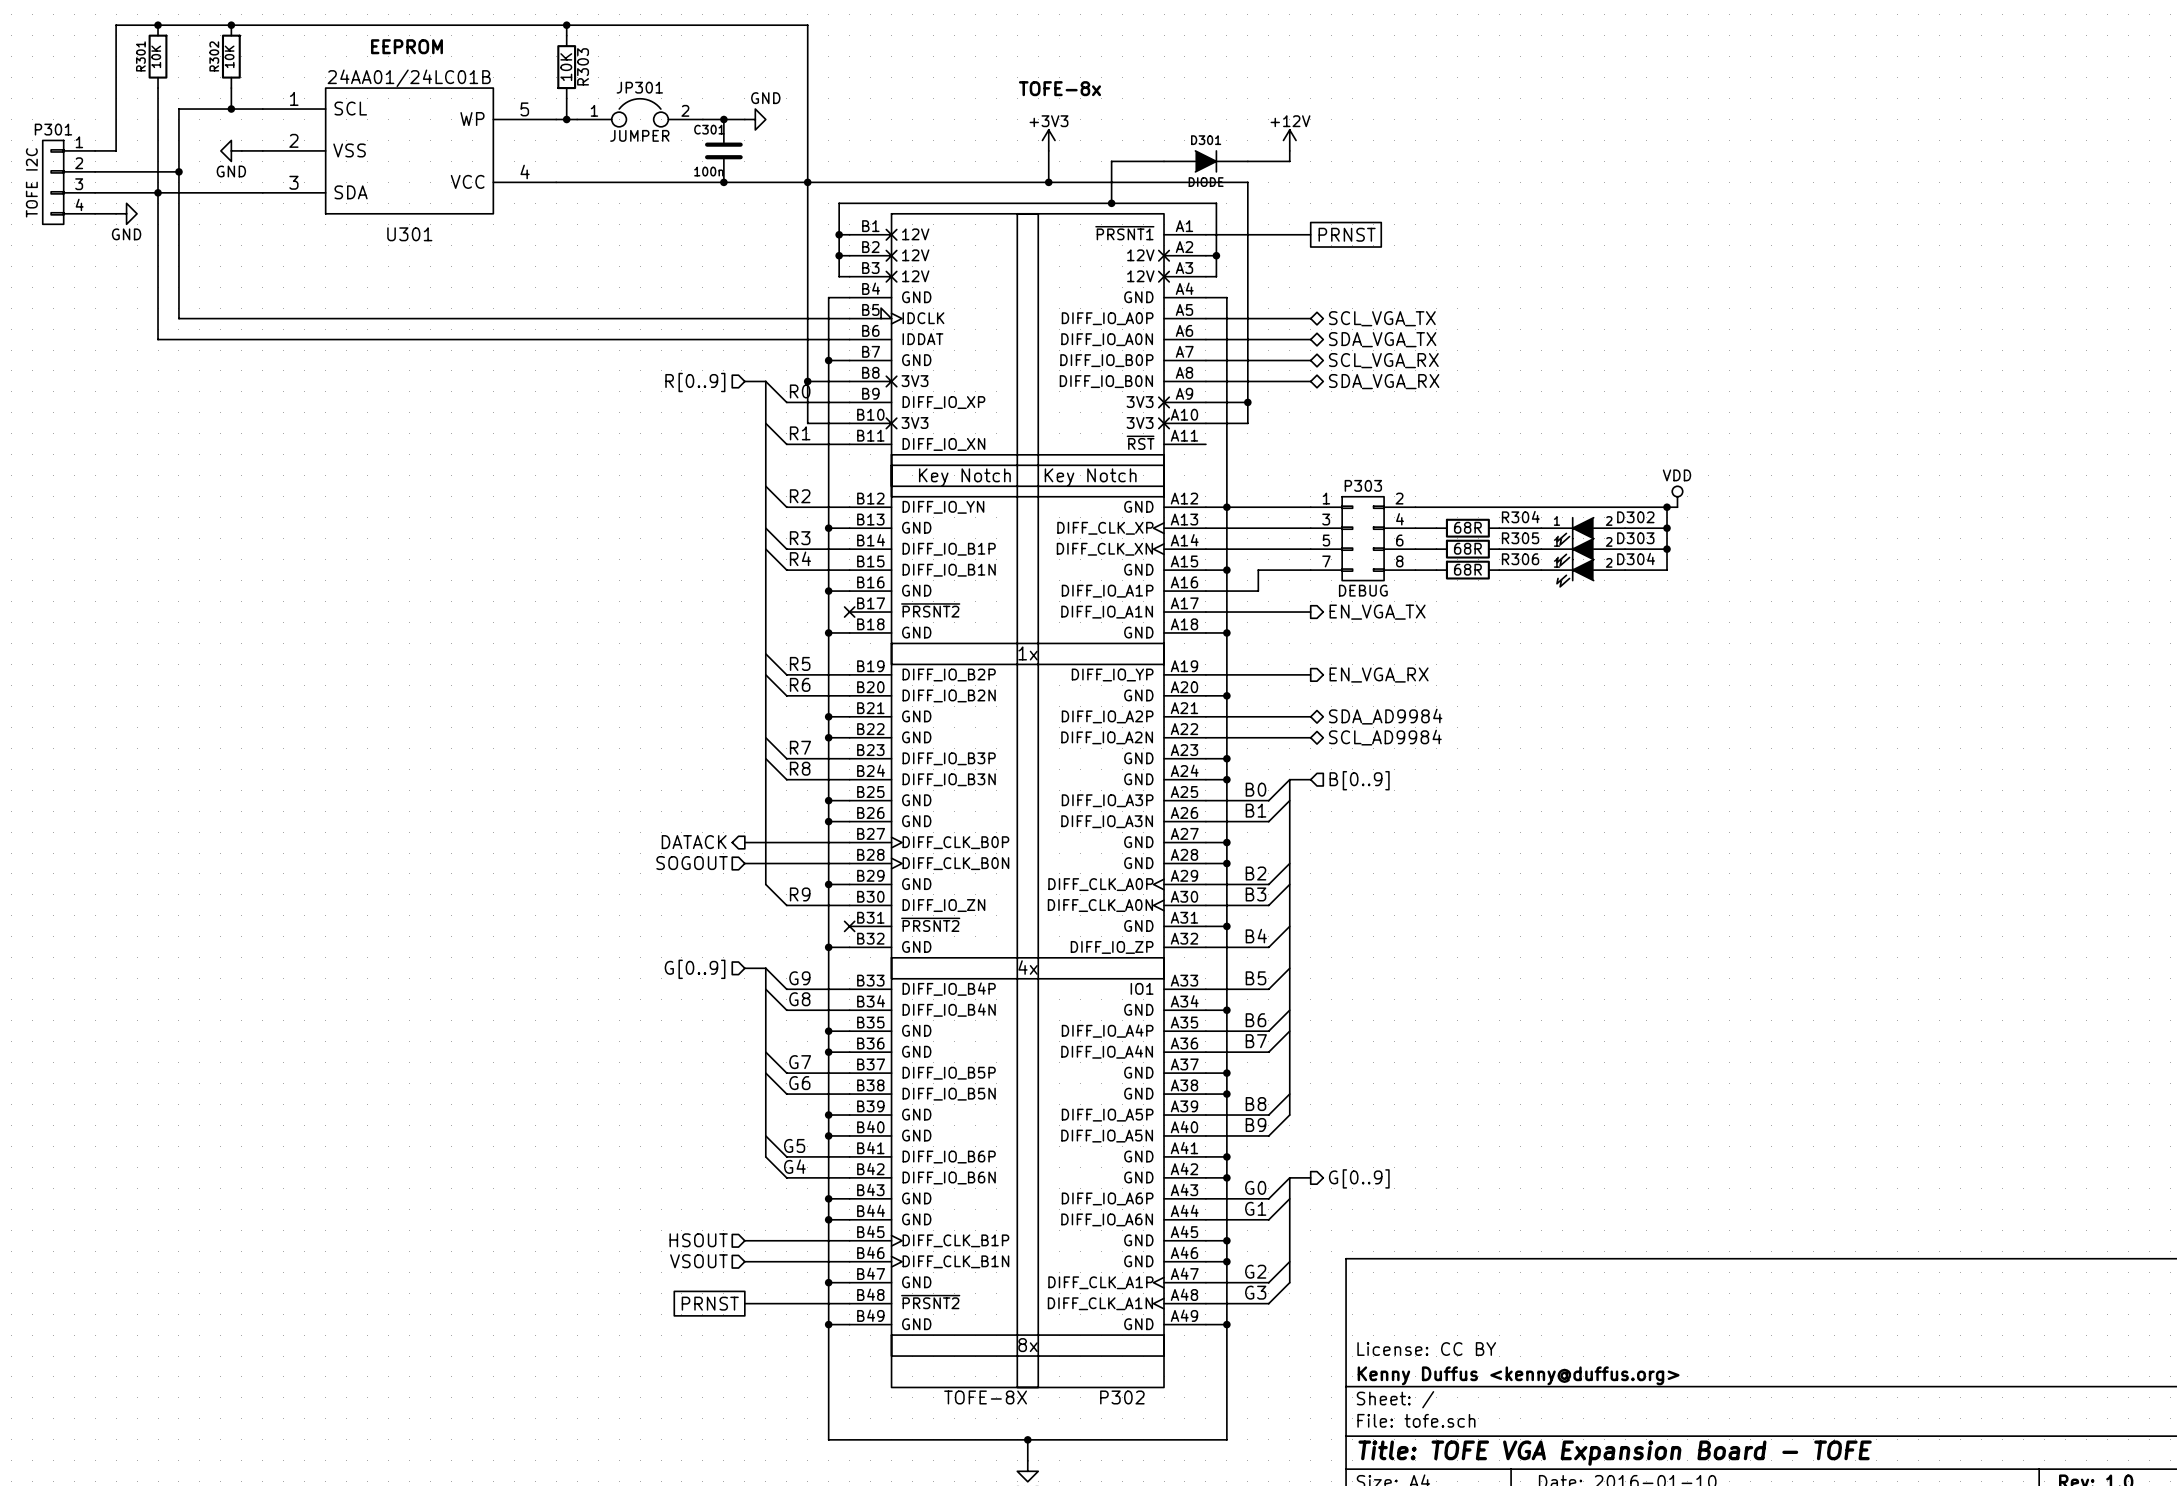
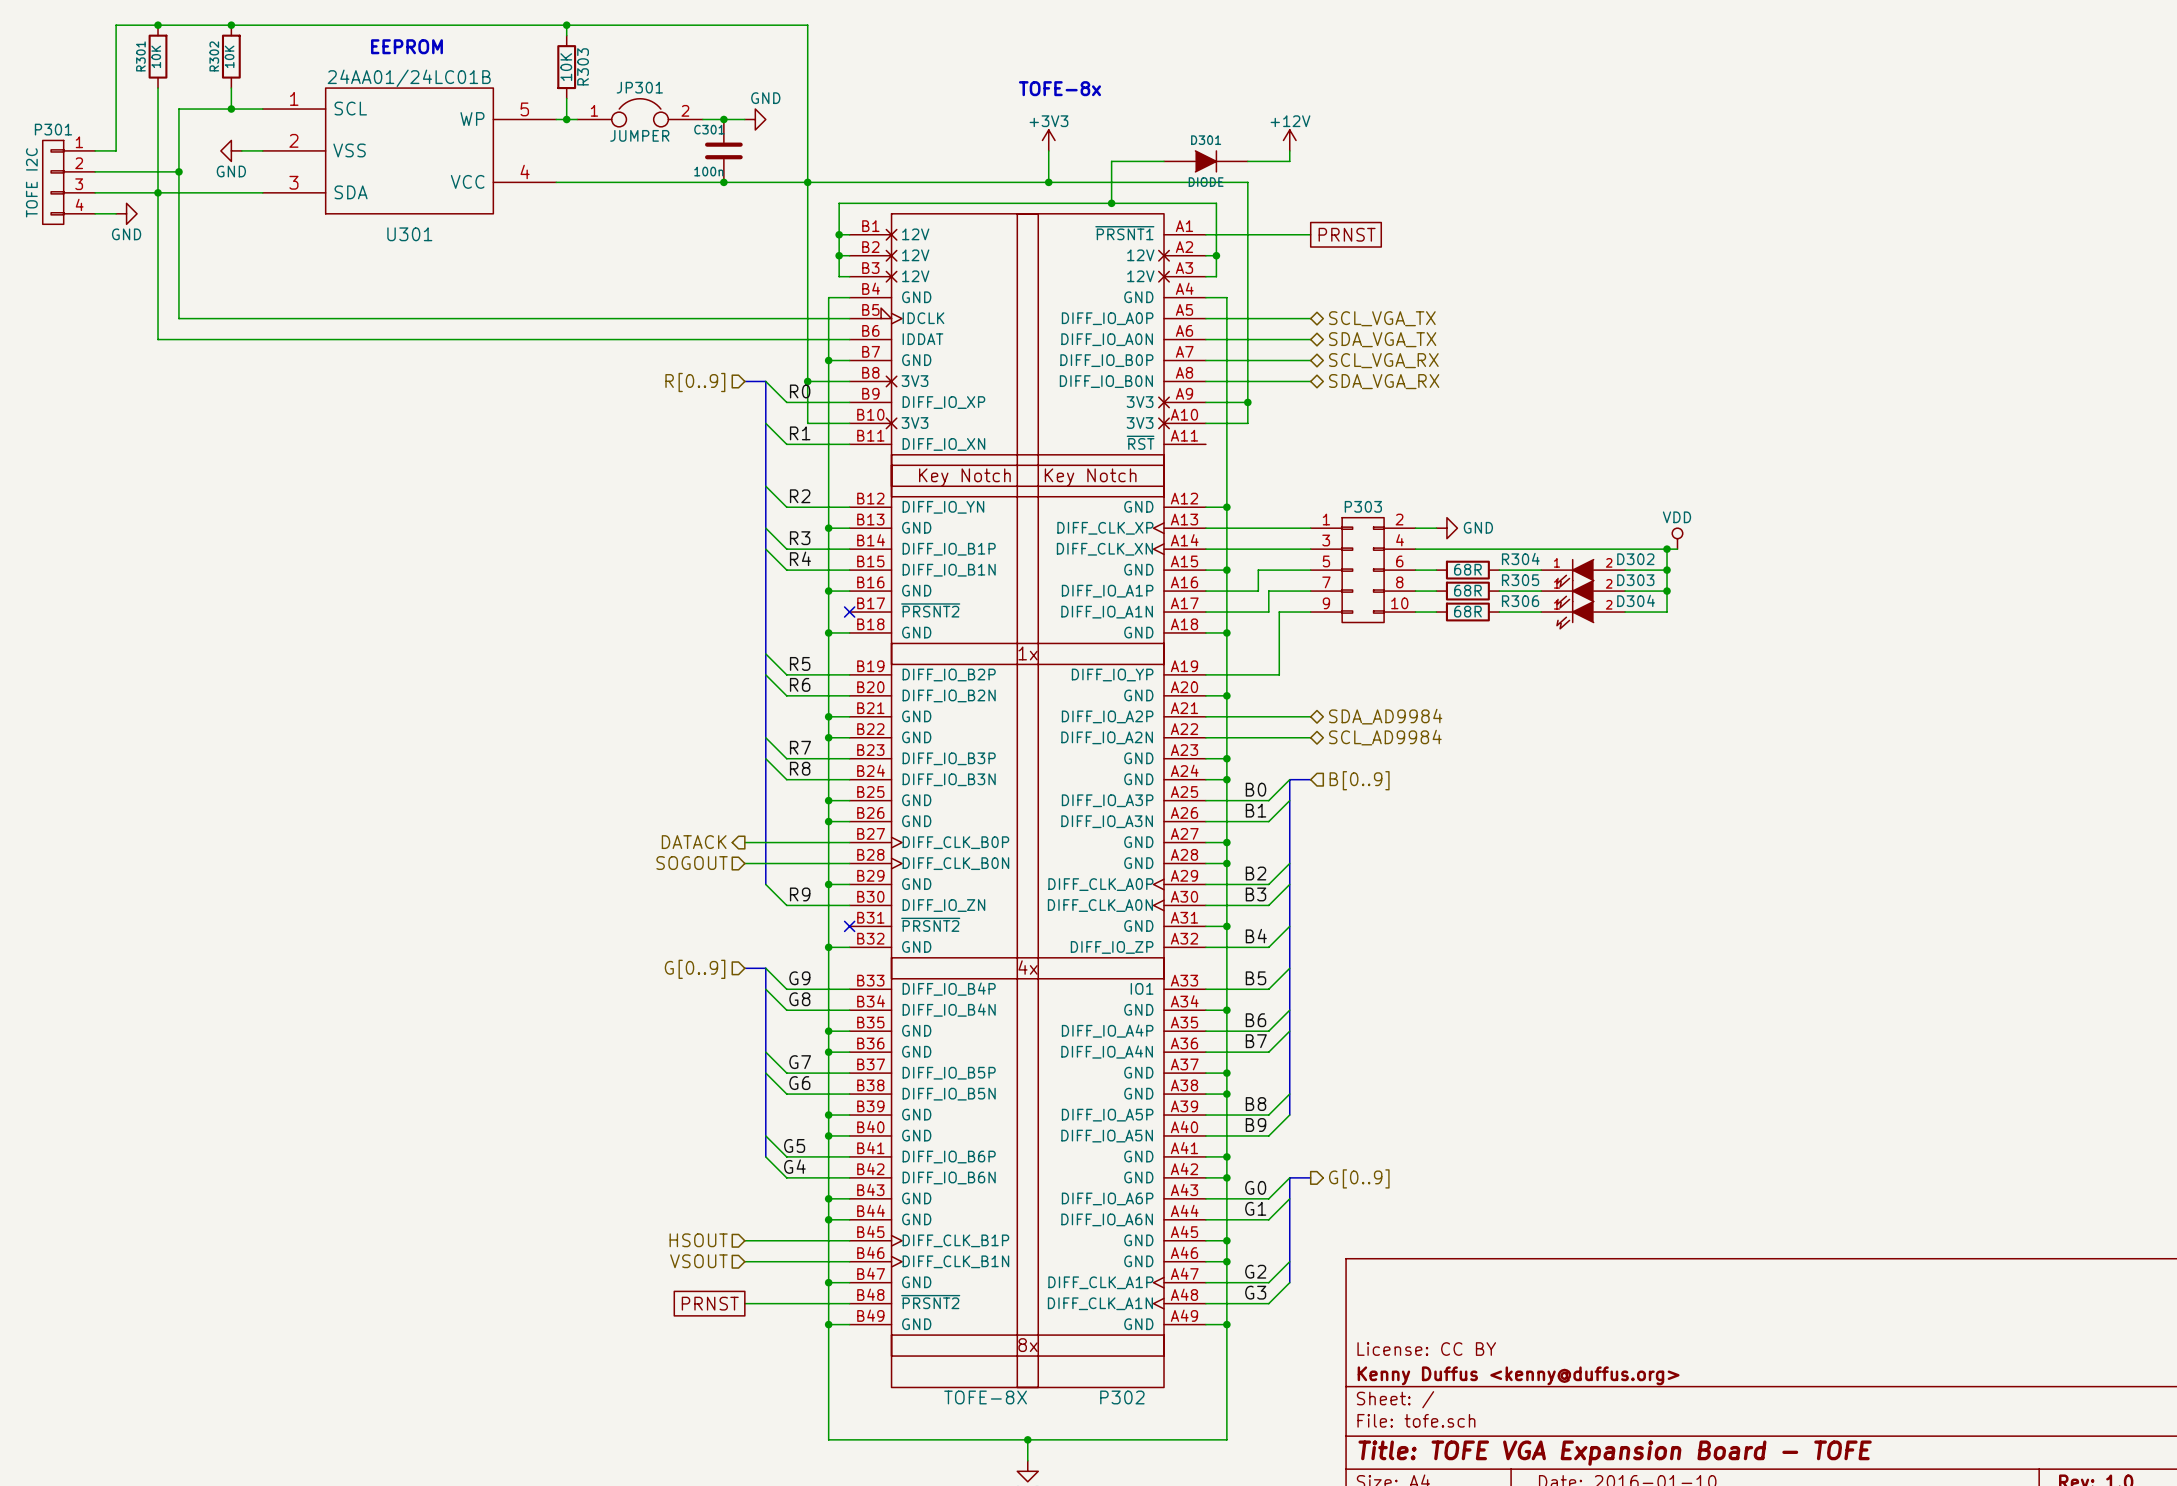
P303 symbol: [1310, 496, 1416, 581] -> [1310, 517, 1416, 623]
power symbol position: VDD (1677, 496) -> VDD (1677, 538)
wire: (1226, 507) (1310, 507) -> none
wire: (1415, 507) (1677, 507) -> none
wire: (1667, 507) (1667, 549) -> (1677, 549) (1667, 549)
junction: (1667, 507) -> none
power symbol: none -> GND (1446, 528)
R304: 68R (1467, 528) -> none
wire: (1499, 528) (1541, 528) -> (1499, 591) (1541, 591)
wire: (1625, 528) (1667, 528) -> (1625, 591) (1667, 591)
junction: (1667, 528) -> none
D302: (1583, 531) -> none
R305 position: (1467, 549) -> (1467, 591)
D303 position: (1583, 552) -> (1583, 594)
D304 name: D304 (1636, 558) -> D302 (1635, 559)
R306 name: R306 (1520, 559) -> R304 (1520, 558)
wire: none -> (1667, 570) (1667, 612) (1625, 612)
junction: none -> (1667, 570)
P303 value: DEBUG (1363, 590) -> none
wire: none -> (1415, 591) (1436, 591)
junction: none -> (1667, 591)
wire: (1268, 612) (1279, 612) -> (1268, 612) (1268, 591) (1310, 591)
hierarchical label: EN_VGA_TX (1377, 612) -> none
wire: none -> (1415, 612) (1436, 612)
R306: none -> 68R (1467, 612)
wire: none -> (1499, 612) (1541, 612)
D304: none -> (1583, 615)
wire: (1279, 674) (1310, 674) -> (1279, 674) (1279, 612)
hierarchical label: EN_VGA_RX (1379, 675) -> none

